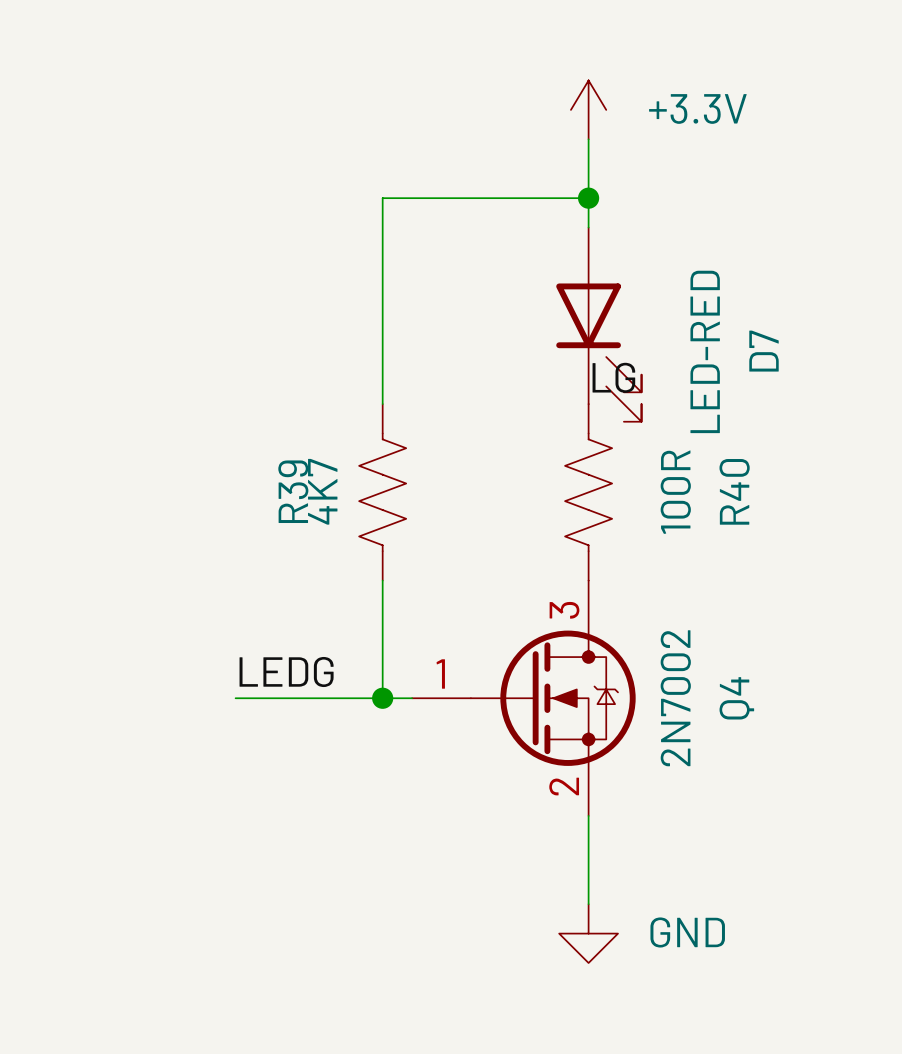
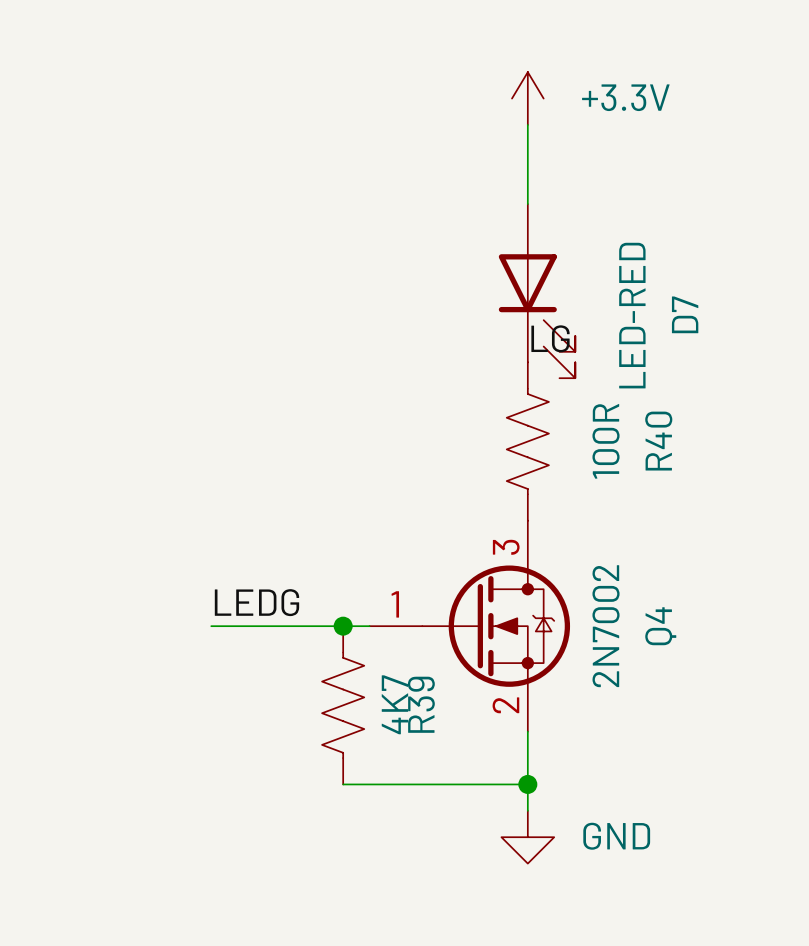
wire: (588, 198) (382, 198) (382, 404) -> none
junction: (588, 198) -> none
R39 name position: R39 (293, 491) -> R39 (421, 704)
R39 value position: 4K7 (322, 491) -> 4K7 (394, 704)
R39 position: (382, 492) -> (343, 705)
wire: (382, 580) (382, 698) -> none
wire: none -> (343, 784) (527, 784)
junction: none -> (527, 784)

